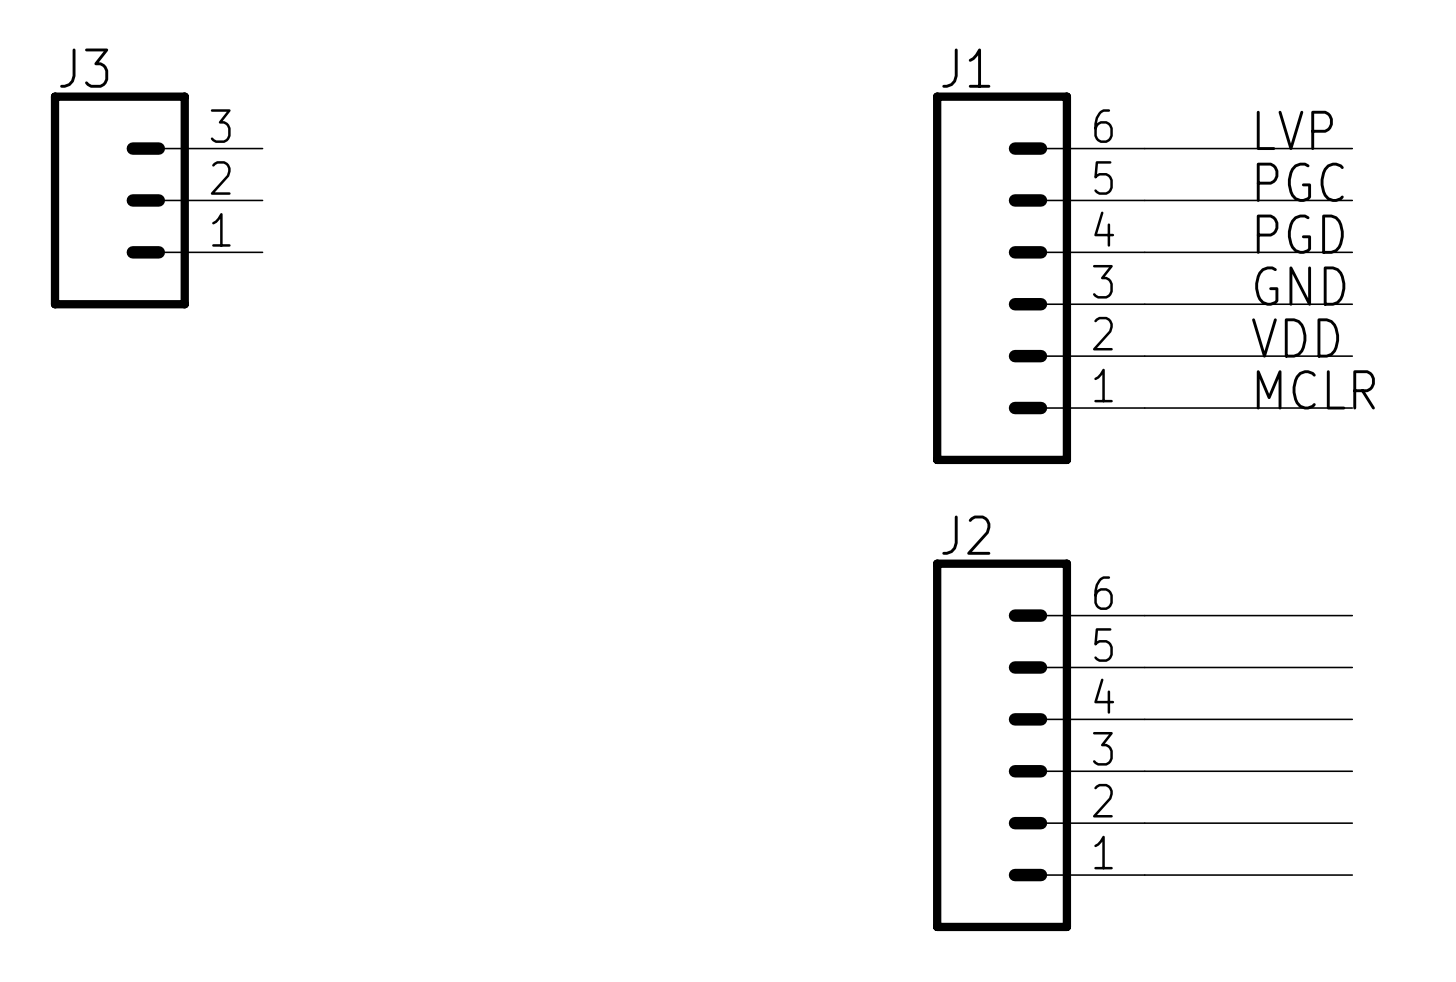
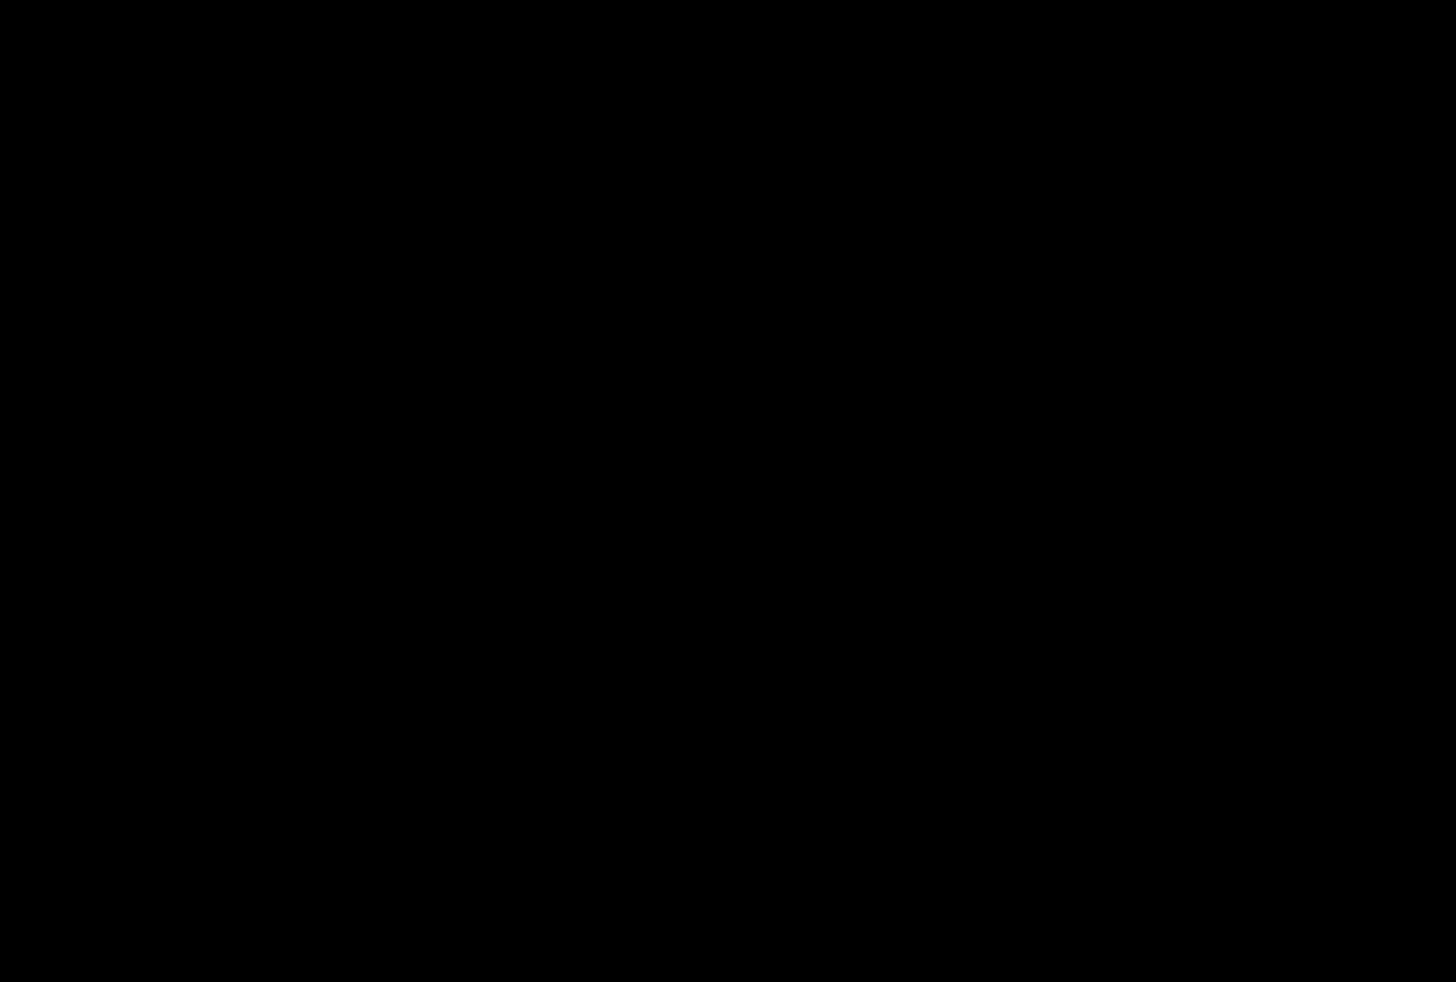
label: LVP (1294, 130) -> none
wire: (1144, 148) (1352, 148) -> none
label: PGC (1300, 182) -> none
J3: (156, 200) -> none
wire: (1144, 200) (1352, 200) -> none
label: PGD (1300, 234) -> none
wire: (1144, 252) (1352, 252) -> none
J1: (1038, 278) -> none
label: GND (1300, 286) -> none
wire: (1144, 304) (1352, 304) -> none
label: VDD (1295, 337) -> none
wire: (1144, 356) (1352, 356) -> none
label: MCLR (1315, 389) -> none
wire: (1144, 408) (1352, 408) -> none
wire: (1144, 615) (1352, 615) -> none
wire: (1144, 667) (1352, 667) -> none
wire: (1144, 719) (1352, 719) -> none
J2: (1038, 745) -> none
wire: (1144, 771) (1352, 771) -> none
wire: (1144, 823) (1352, 823) -> none
wire: (1144, 875) (1352, 875) -> none

